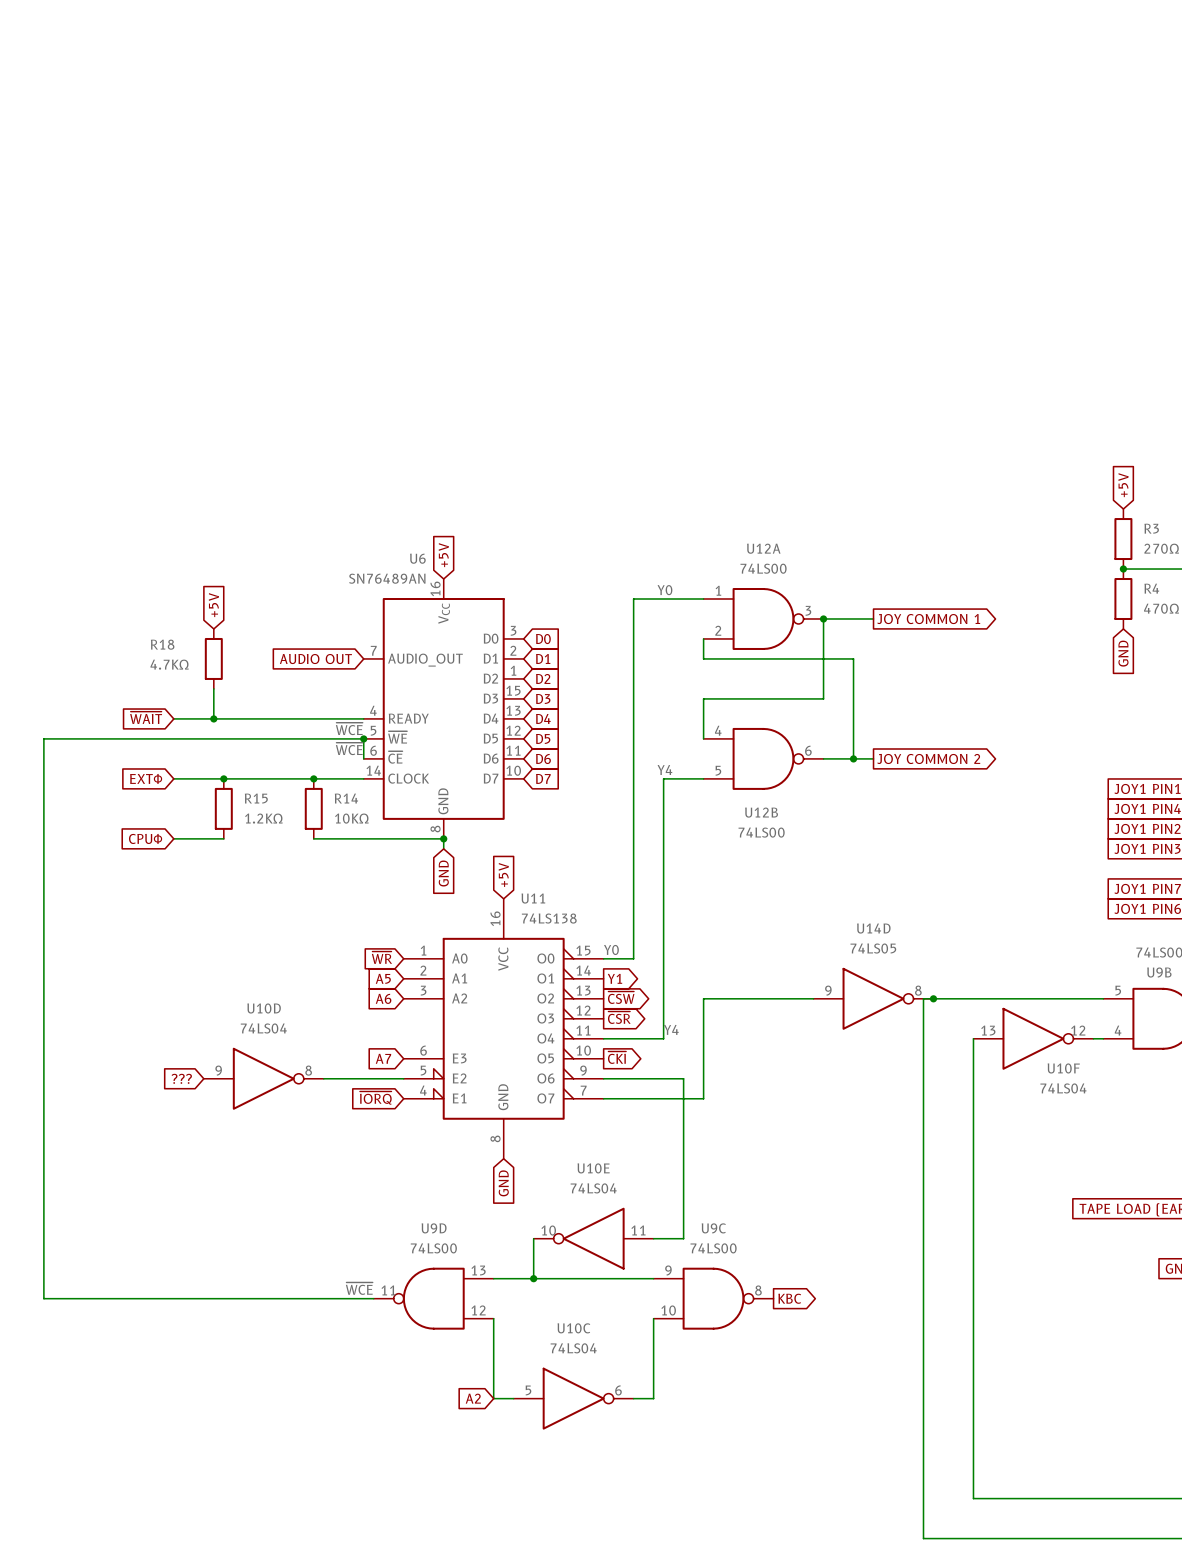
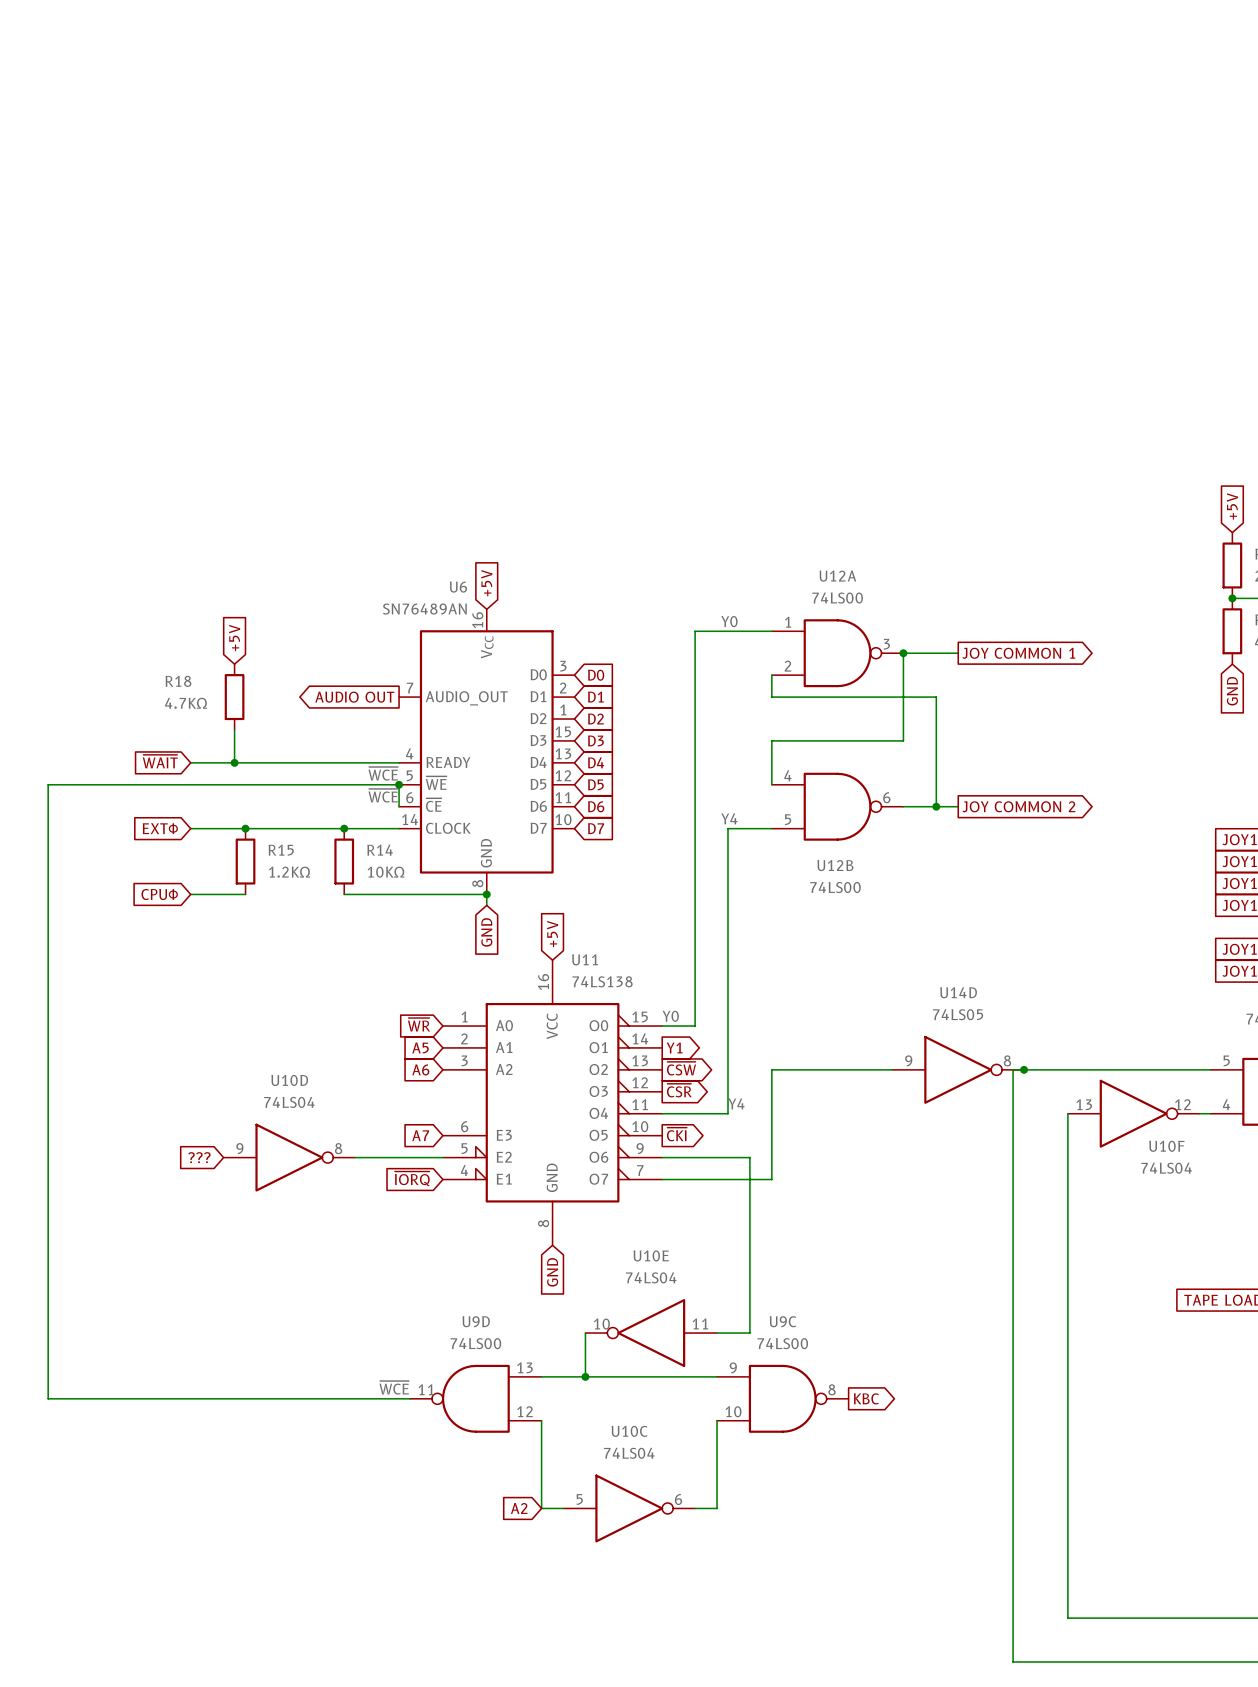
global label shape: input (315, 659) -> output (354, 697)

